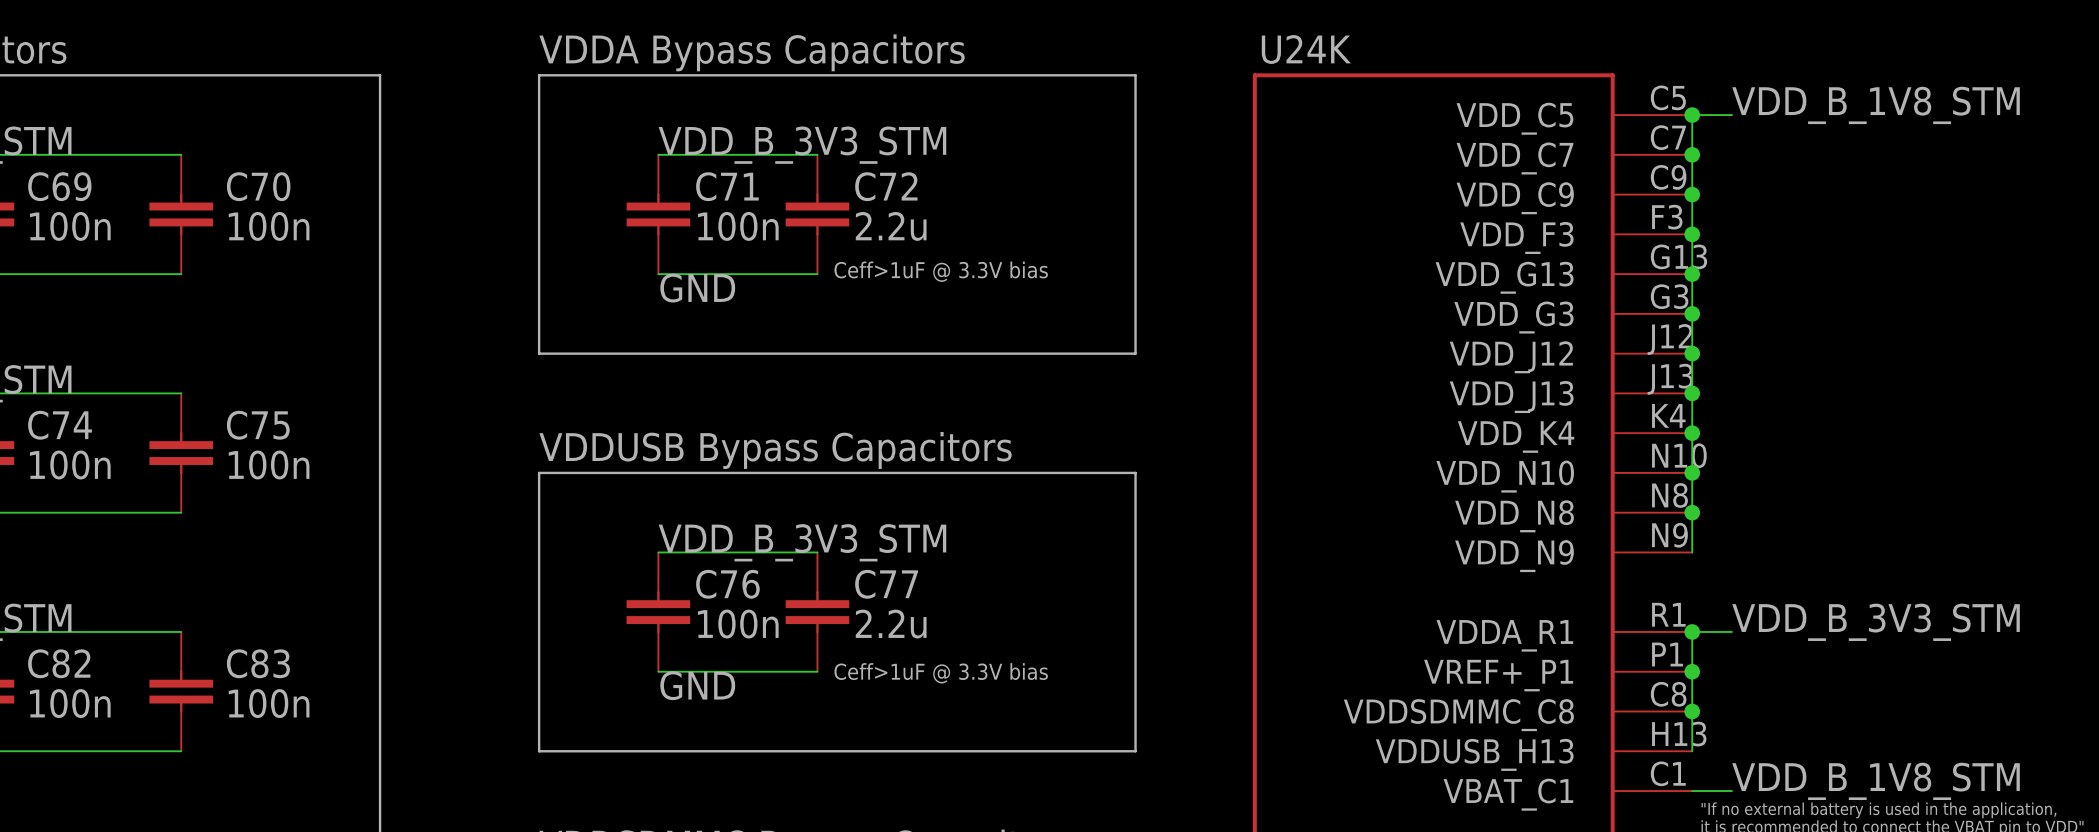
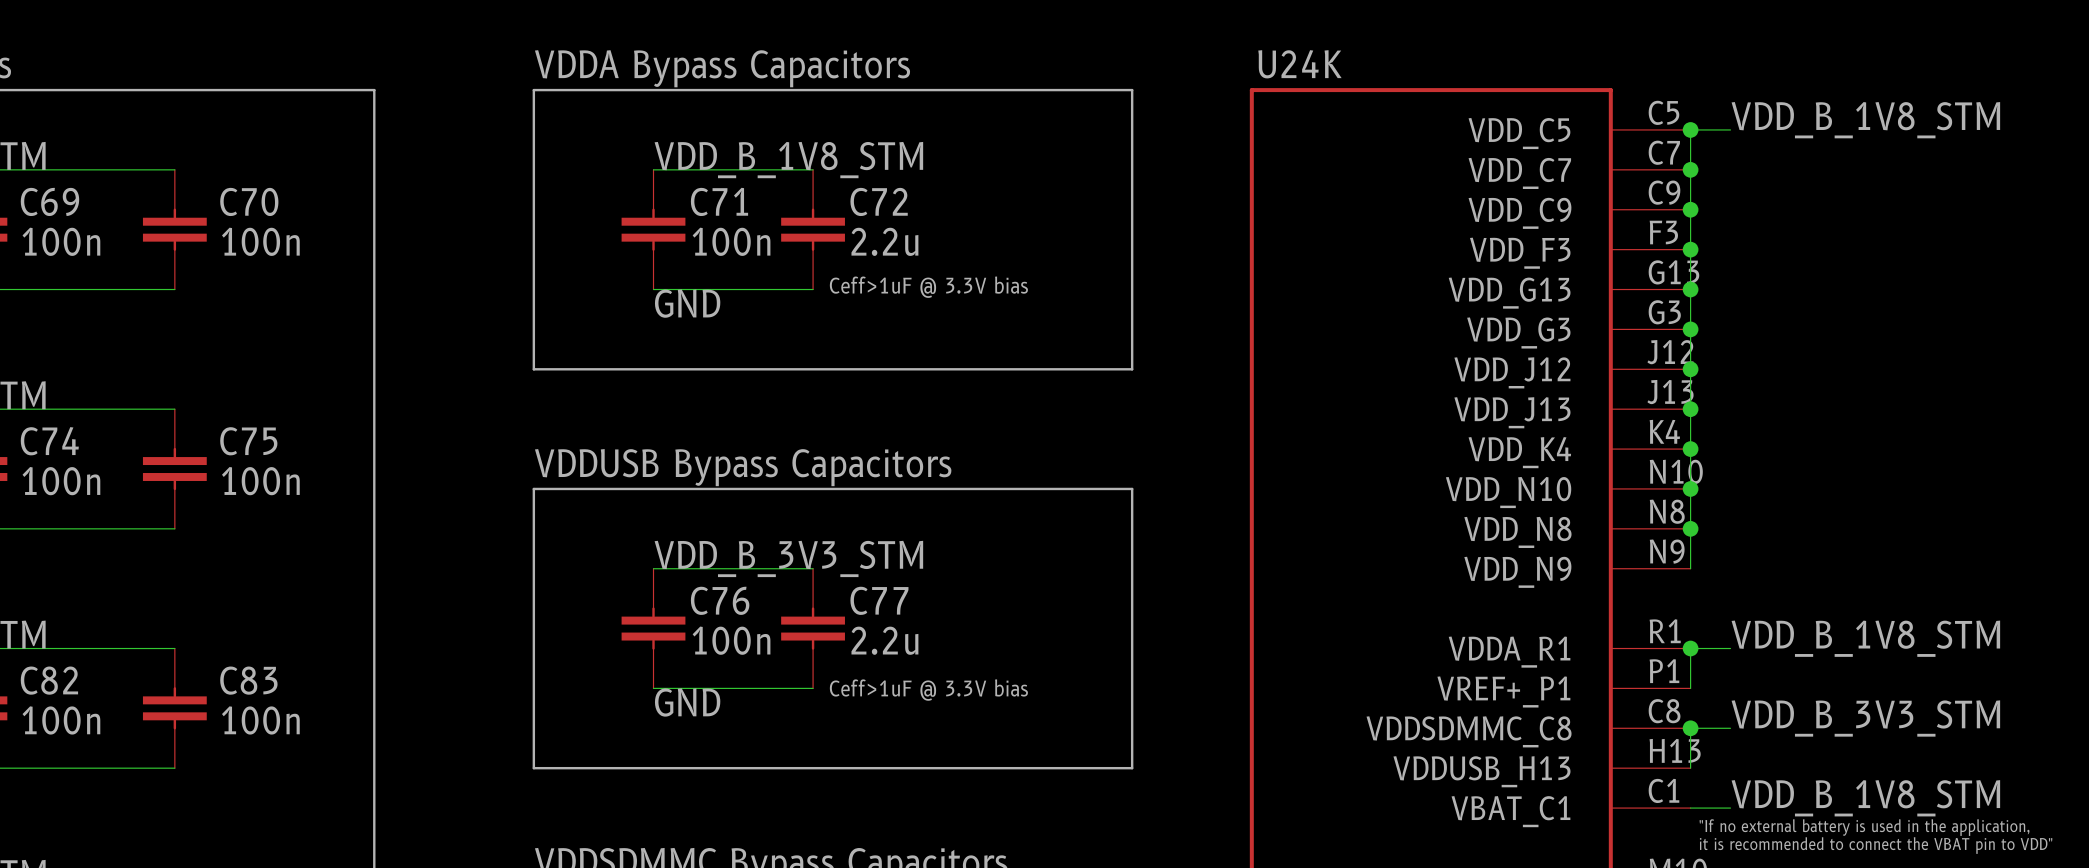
label: VDD_B_3V3_STM (802, 145) -> VDD_B_1V8_STM (788, 160)
label: VDD_B_3V3_STM (1876, 622) -> VDD_B_1V8_STM (1865, 638)
wire: (1692, 671) (1692, 711) -> (1730, 728) (1690, 728)
junction: (1692, 671) -> none
label: none -> VDD_B_3V3_STM (1865, 718)

